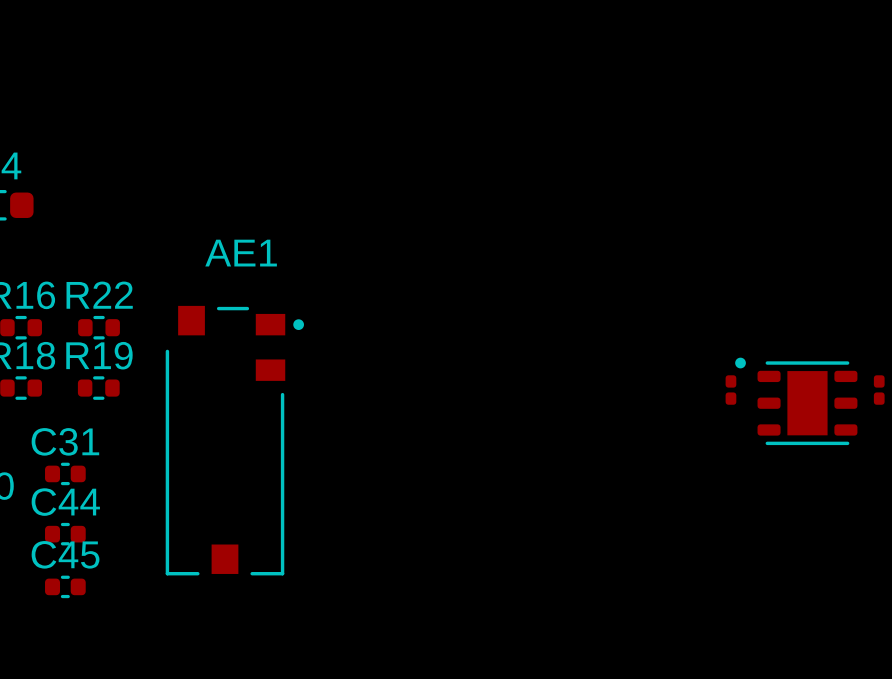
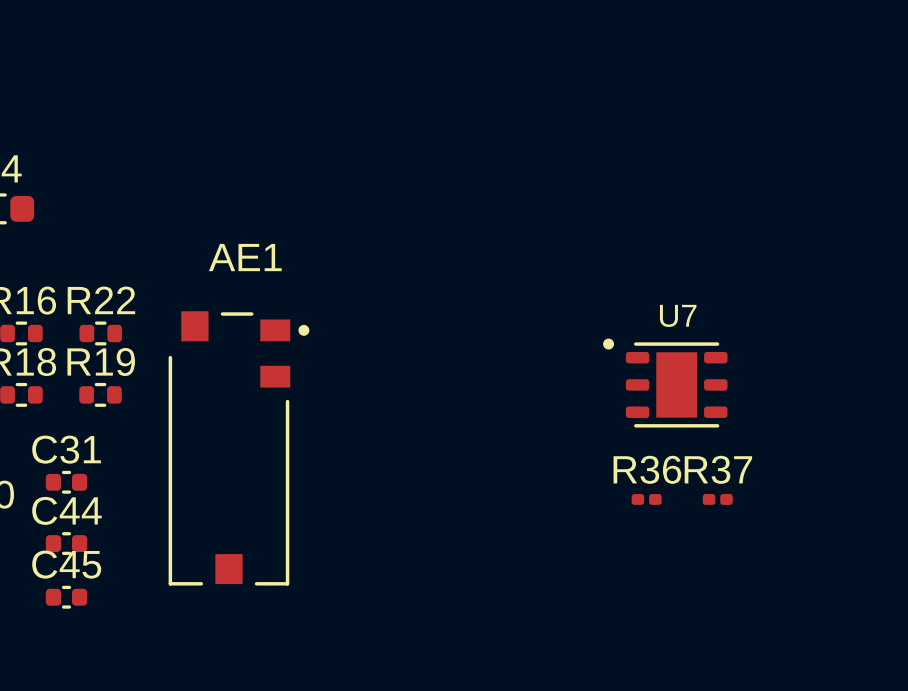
U7: none -> (665, 383)
part: (730, 390) -> none
part: (879, 390) -> none
part: (796, 401) -> none
R36: none -> (646, 499)
R37: none -> (717, 499)

